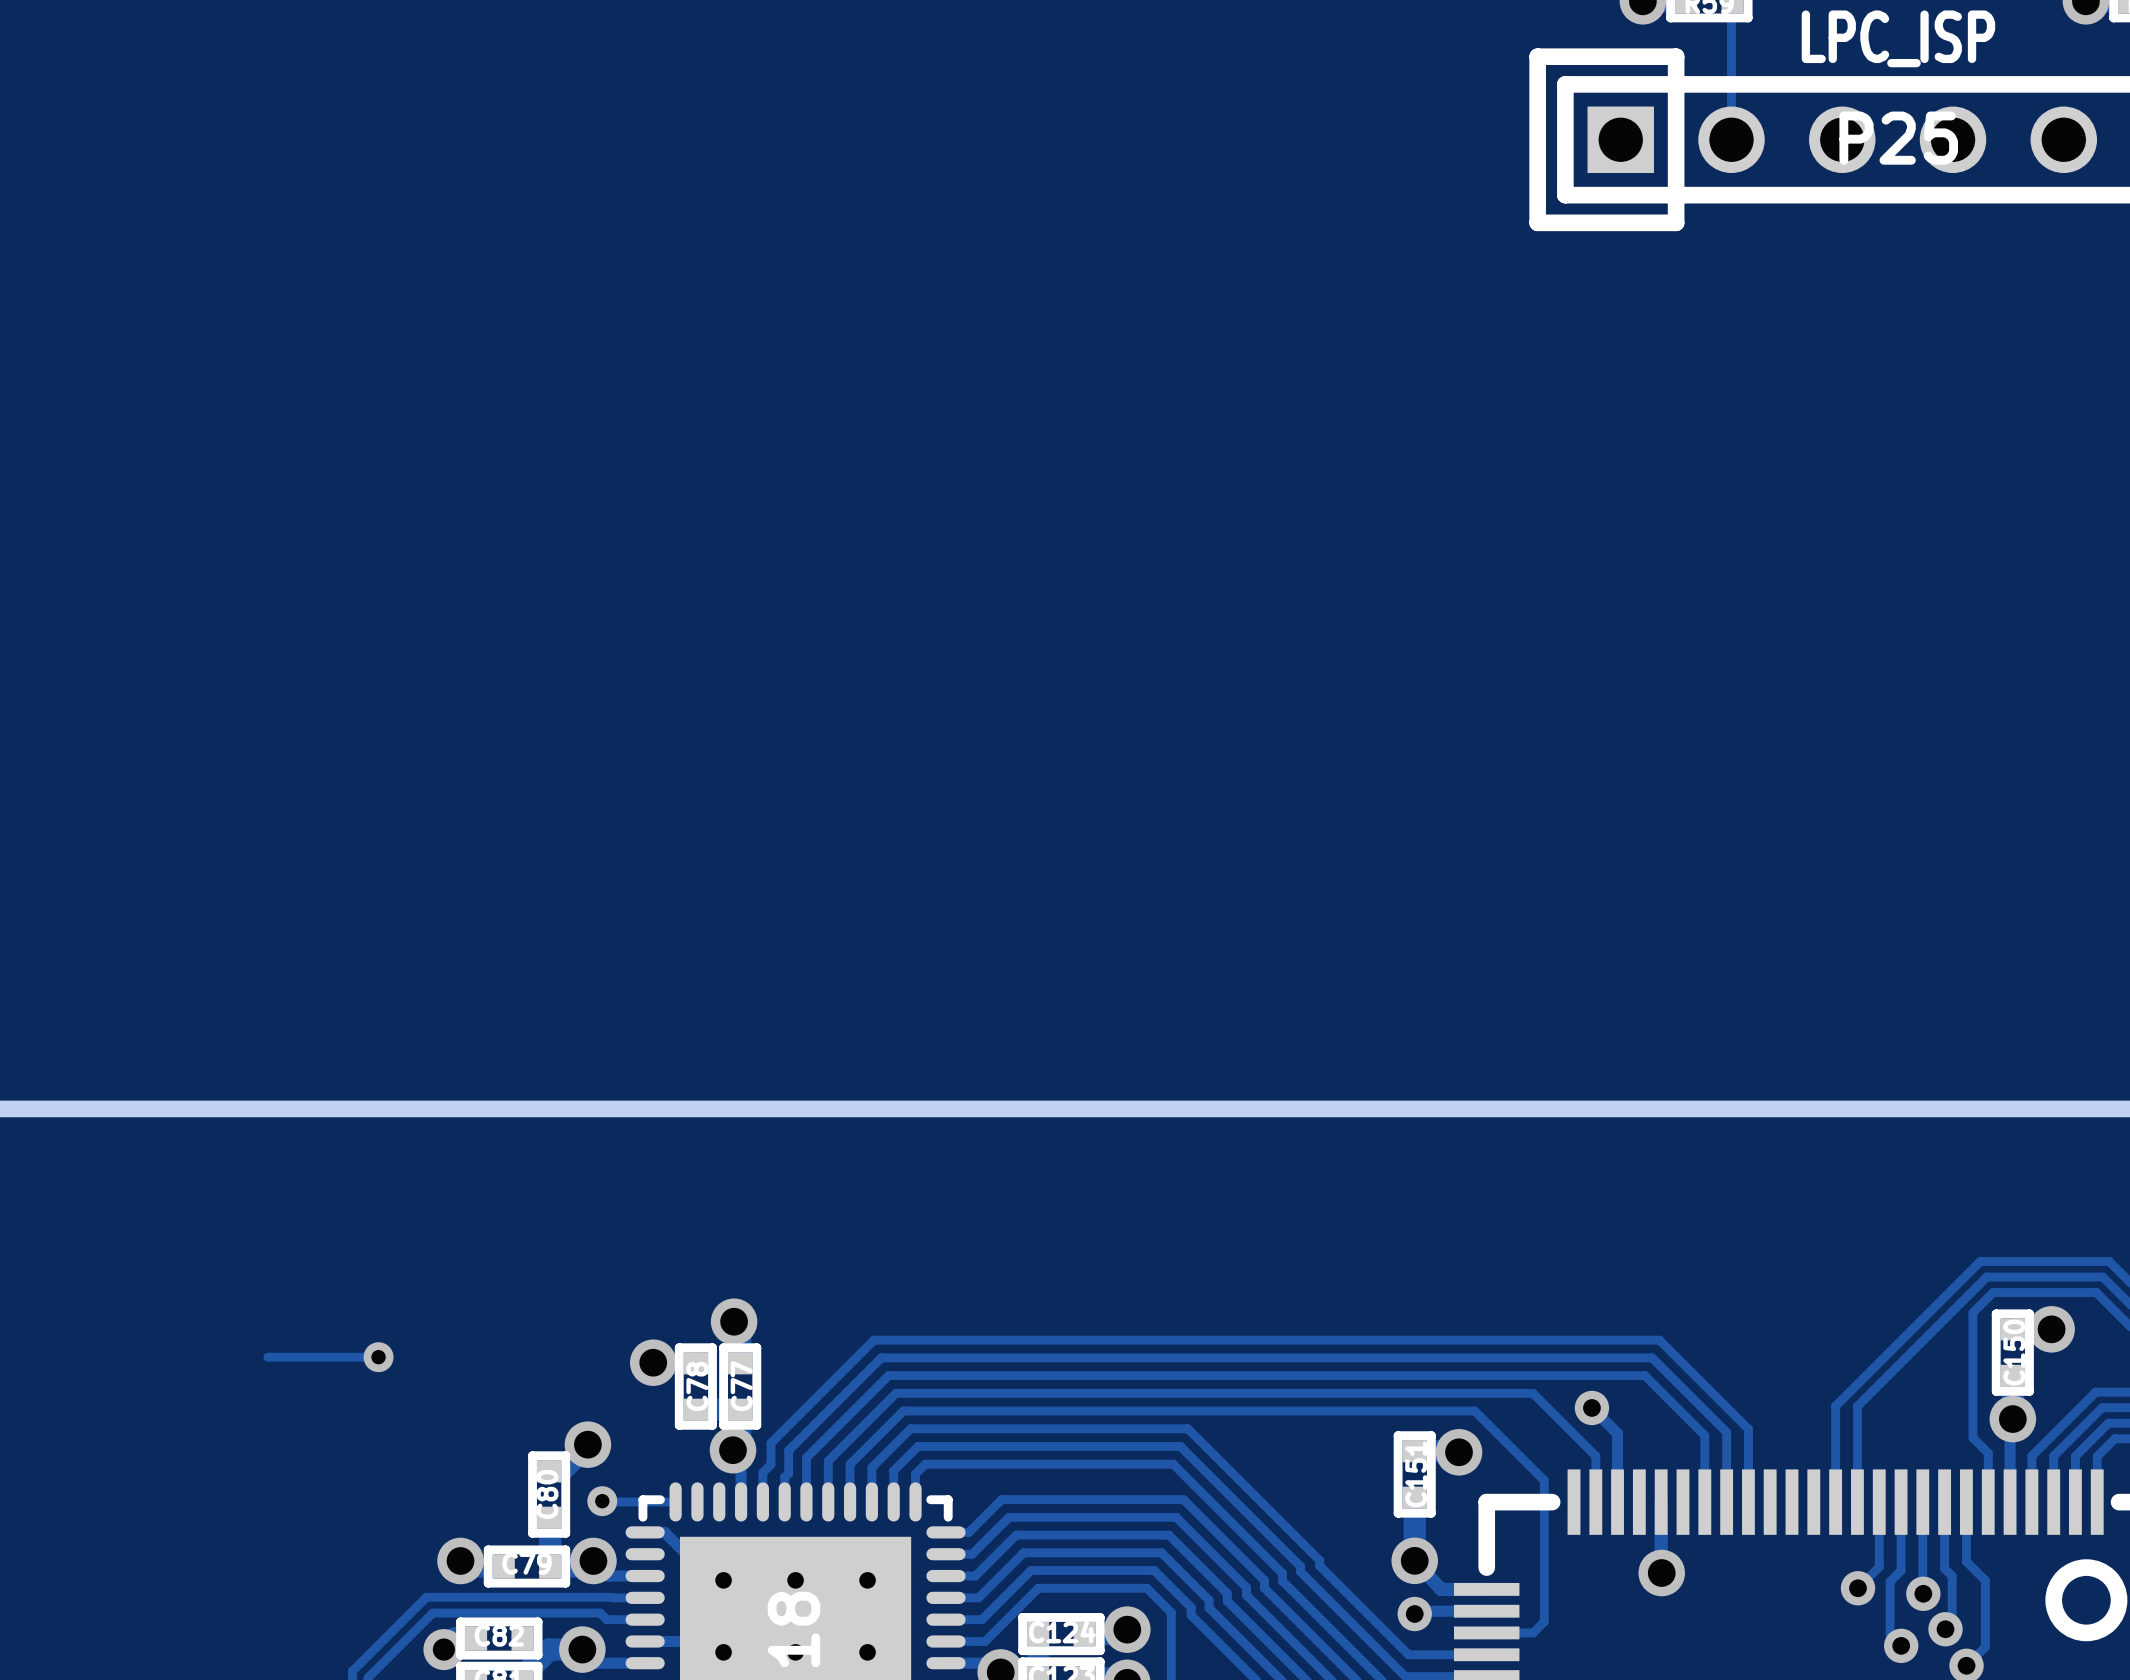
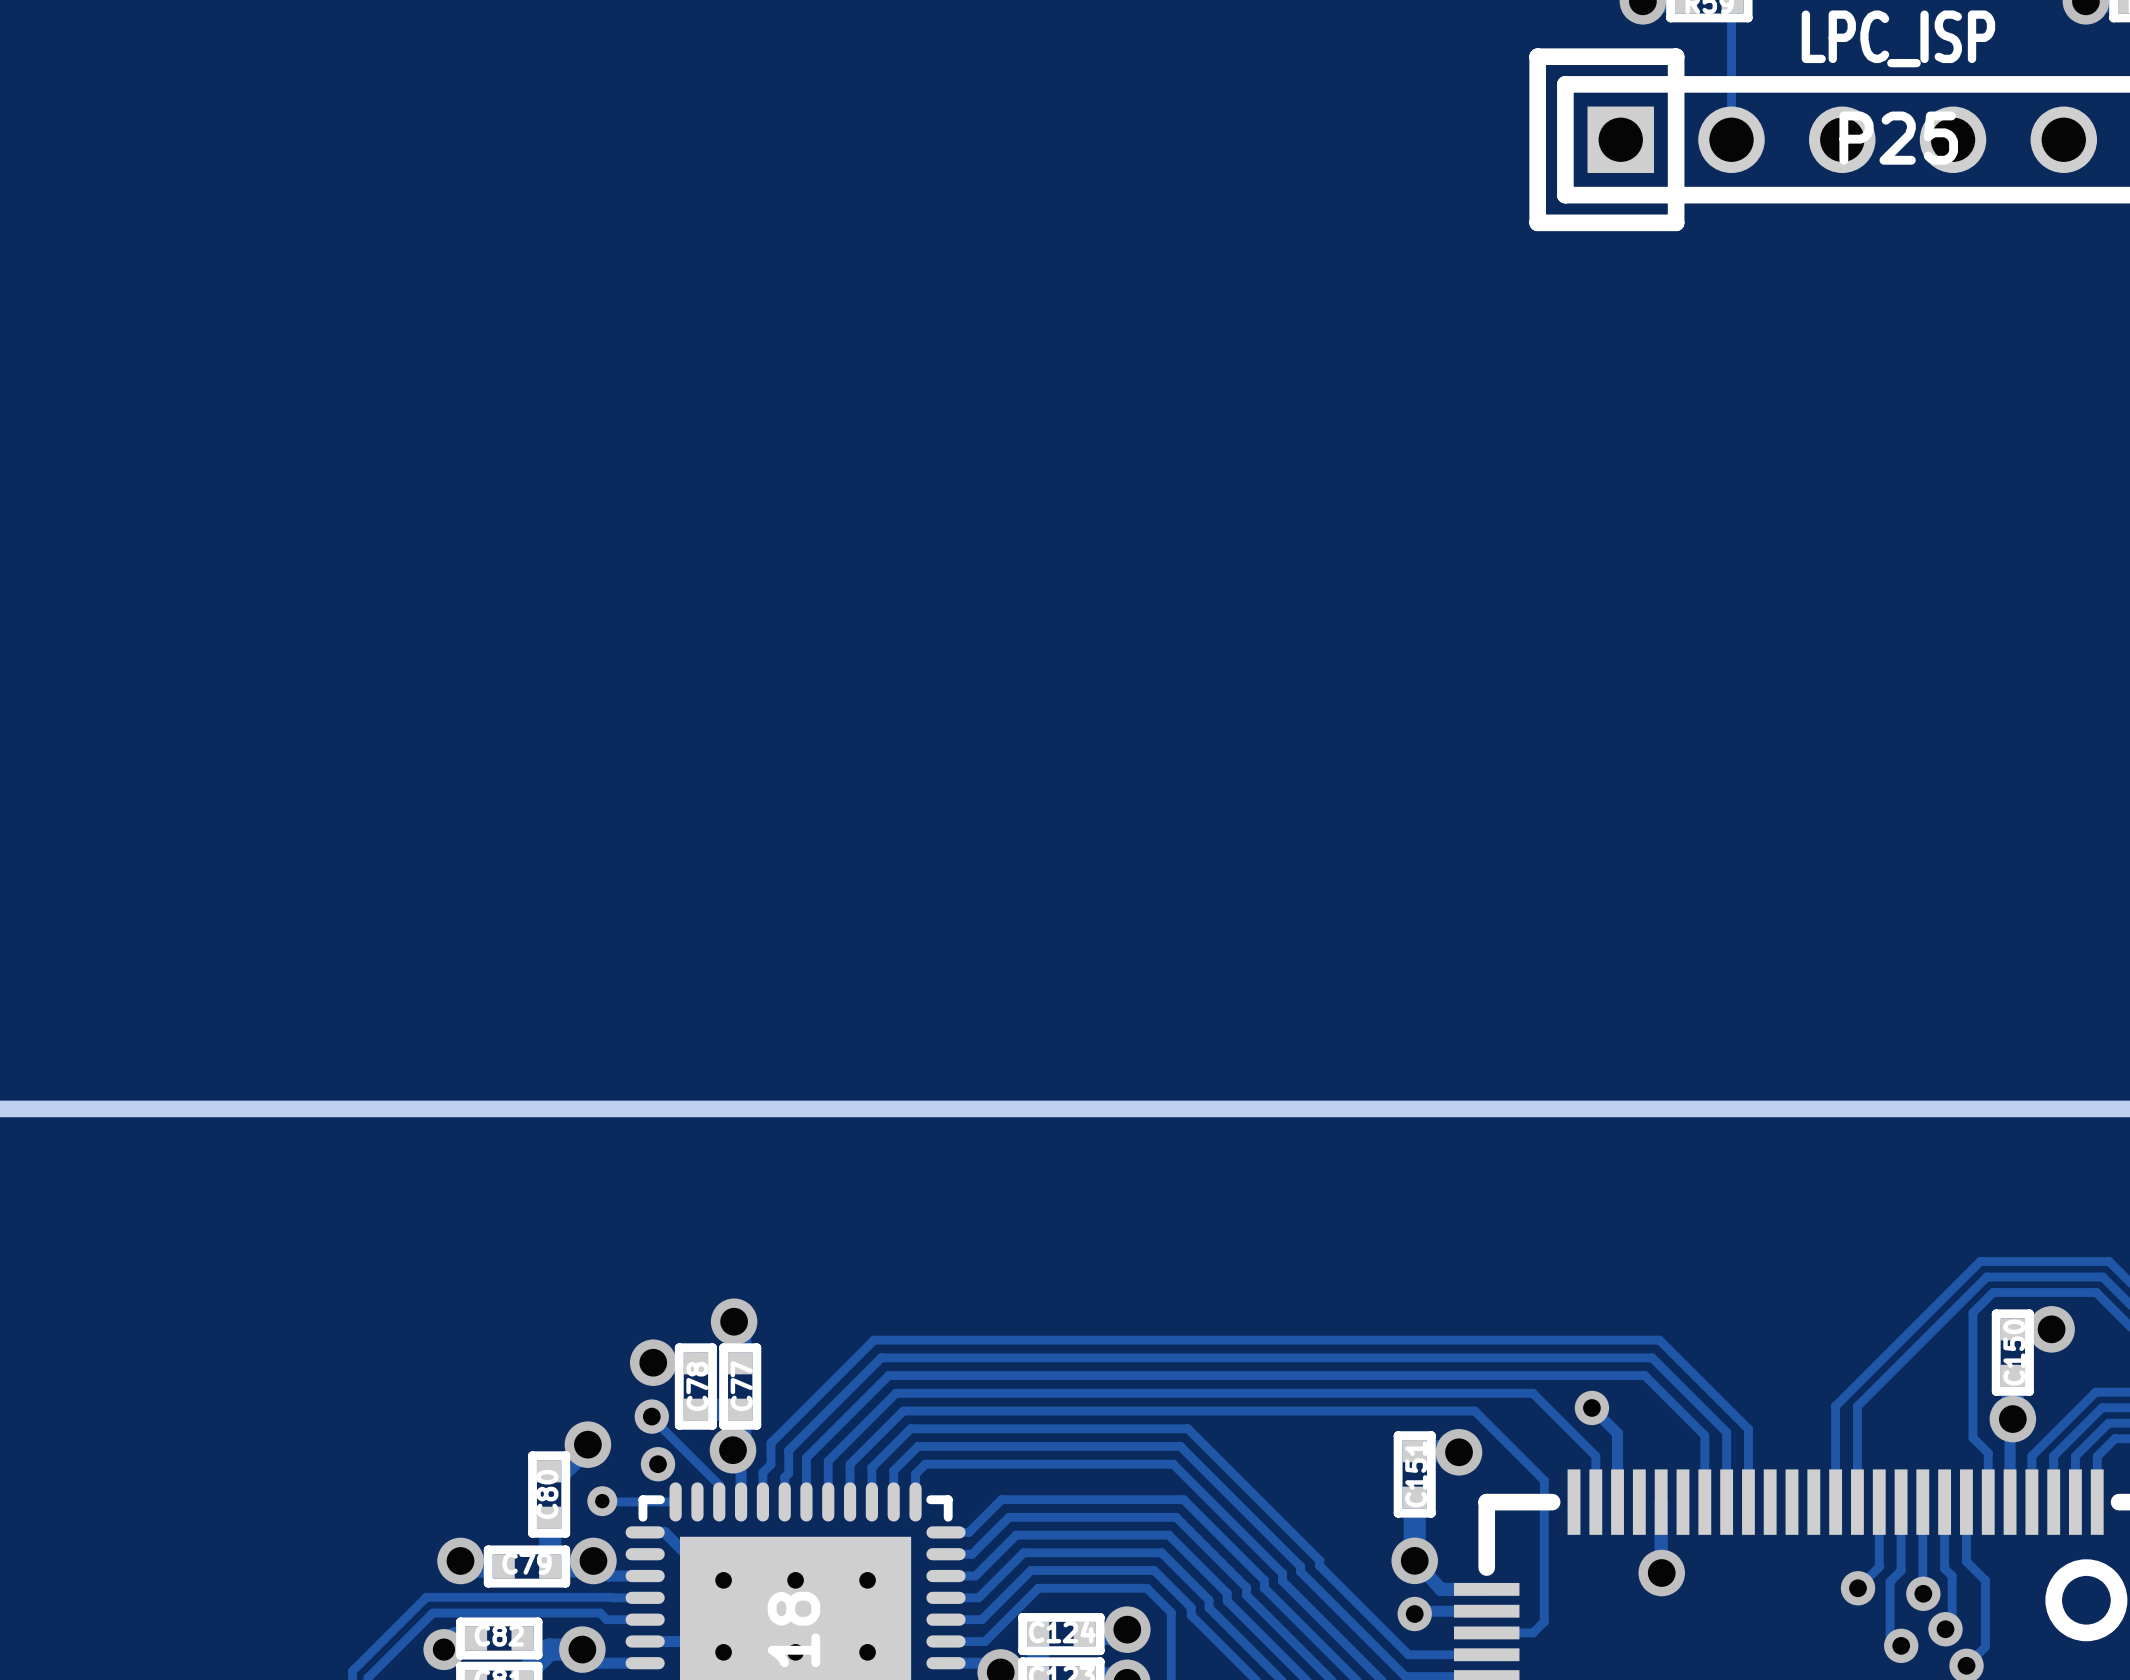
track: (267, 1357) (378, 1357) -> none
via: (378, 1357) -> none
track: none -> (651, 1416) (719, 1485) (719, 1501)
via: none -> (651, 1416)
via: none -> (658, 1464)

